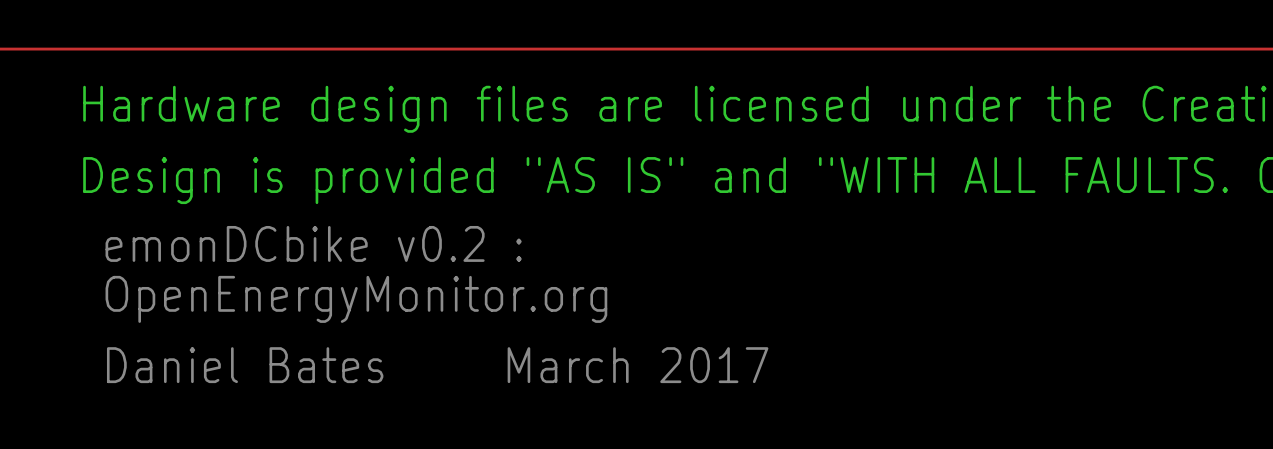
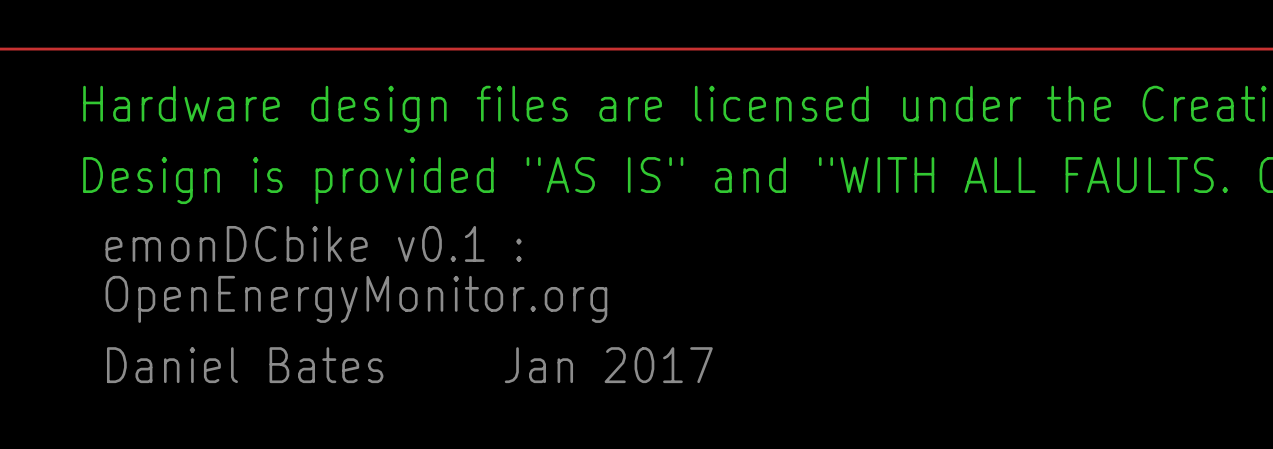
text: emonDCbike v0.2 : (313, 243) -> emonDCbike v0.1 : (313, 243)
text: Daniel Bates March 2017 (437, 365) -> Daniel Bates Jan 2017 (409, 365)

